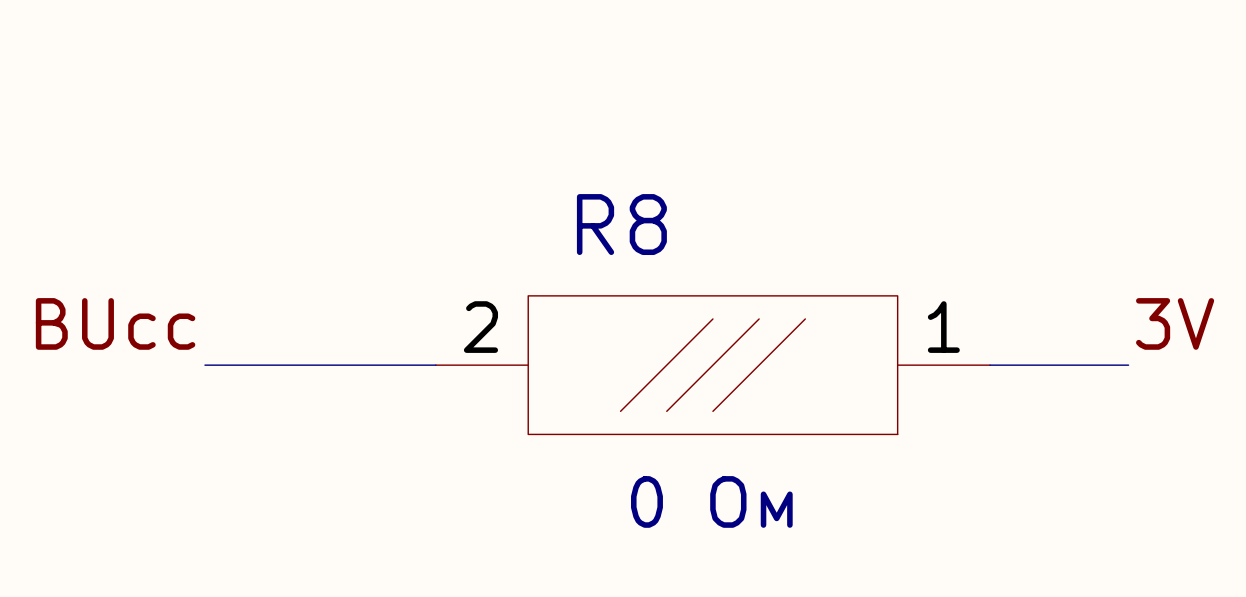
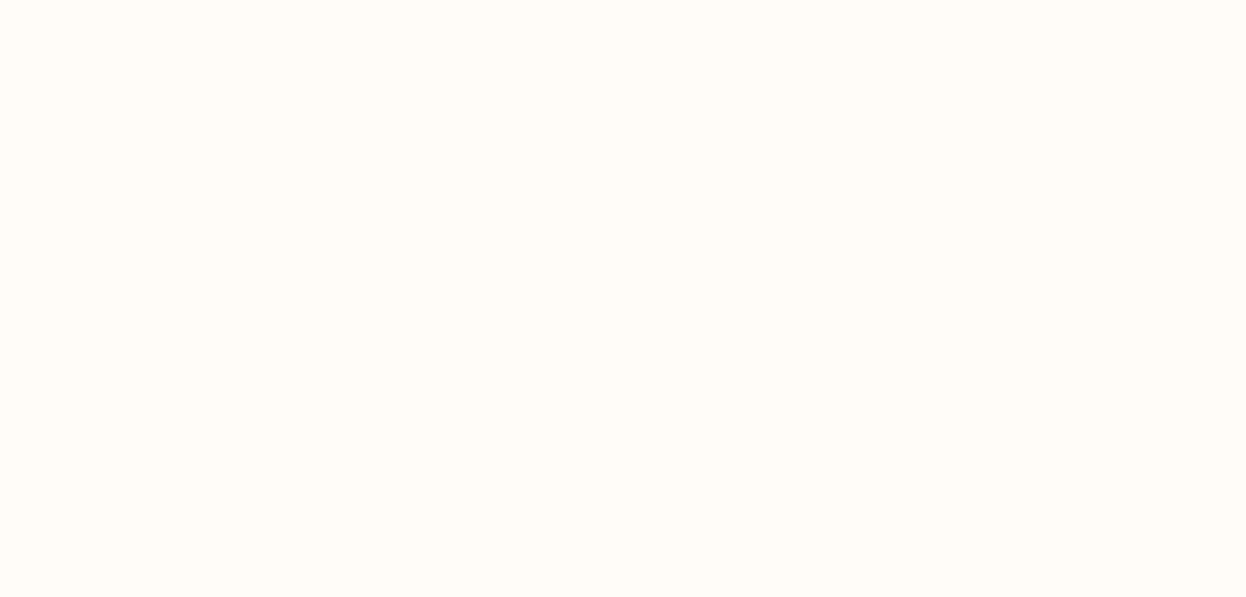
label: BUcc (115, 323) -> none
label: 3V (1175, 323) -> none
wire: (204, 365) (435, 365) -> none
R8: (712, 365) -> none
wire: (990, 365) (1128, 365) -> none

